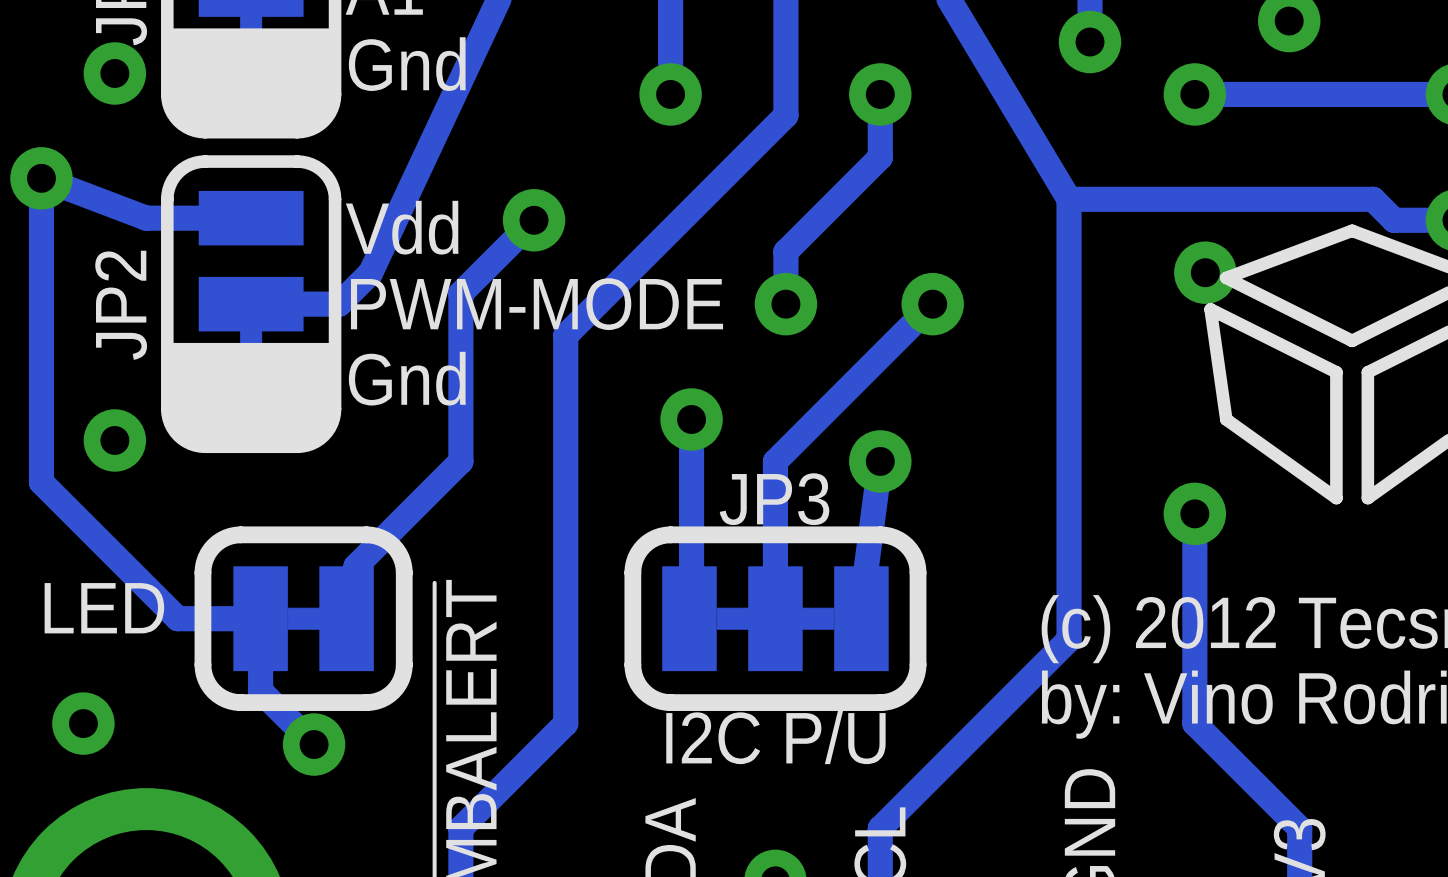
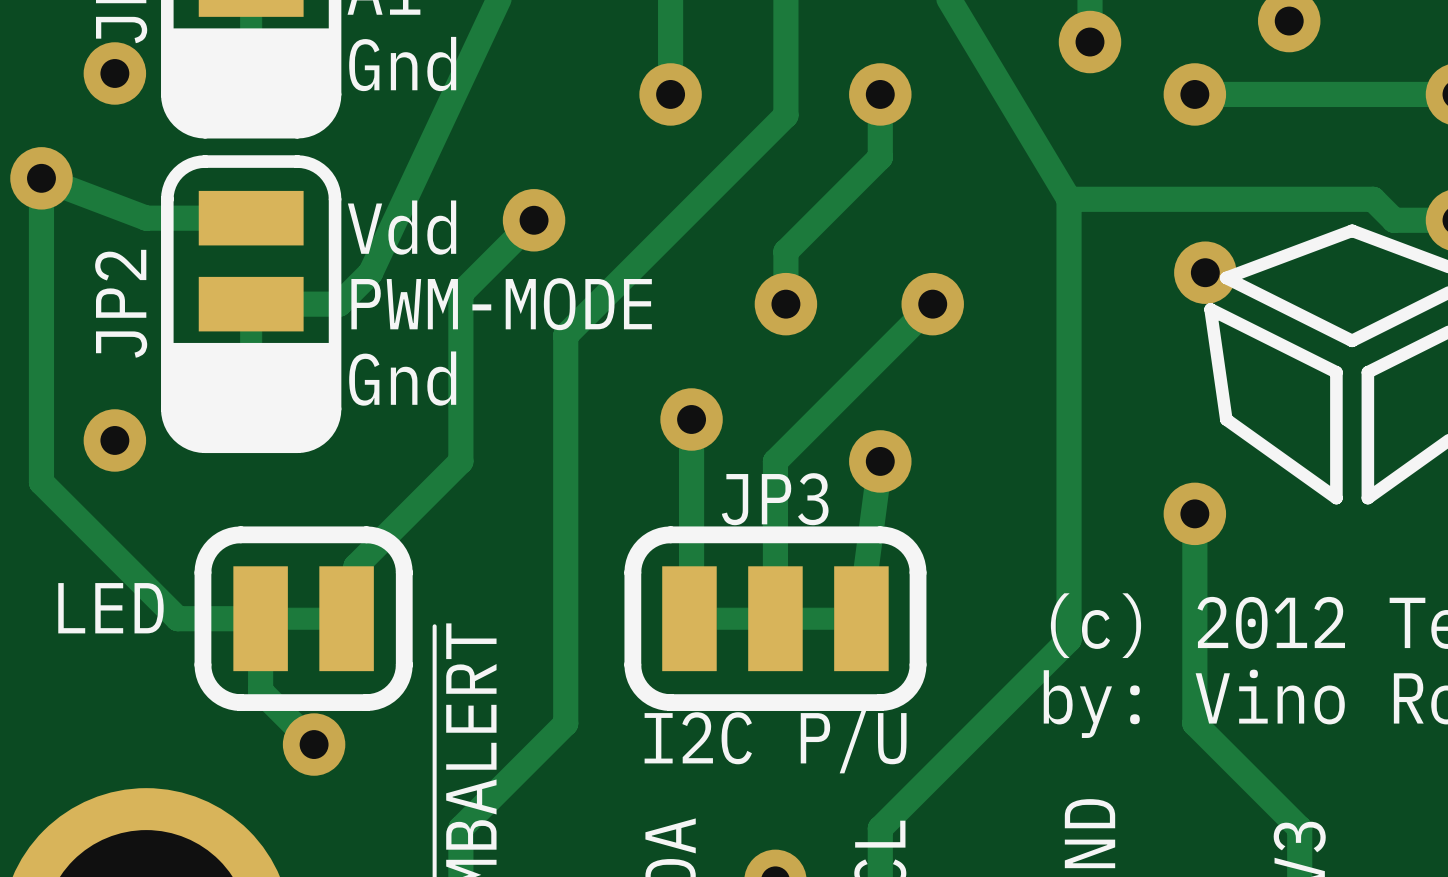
via: (83, 723) -> none

